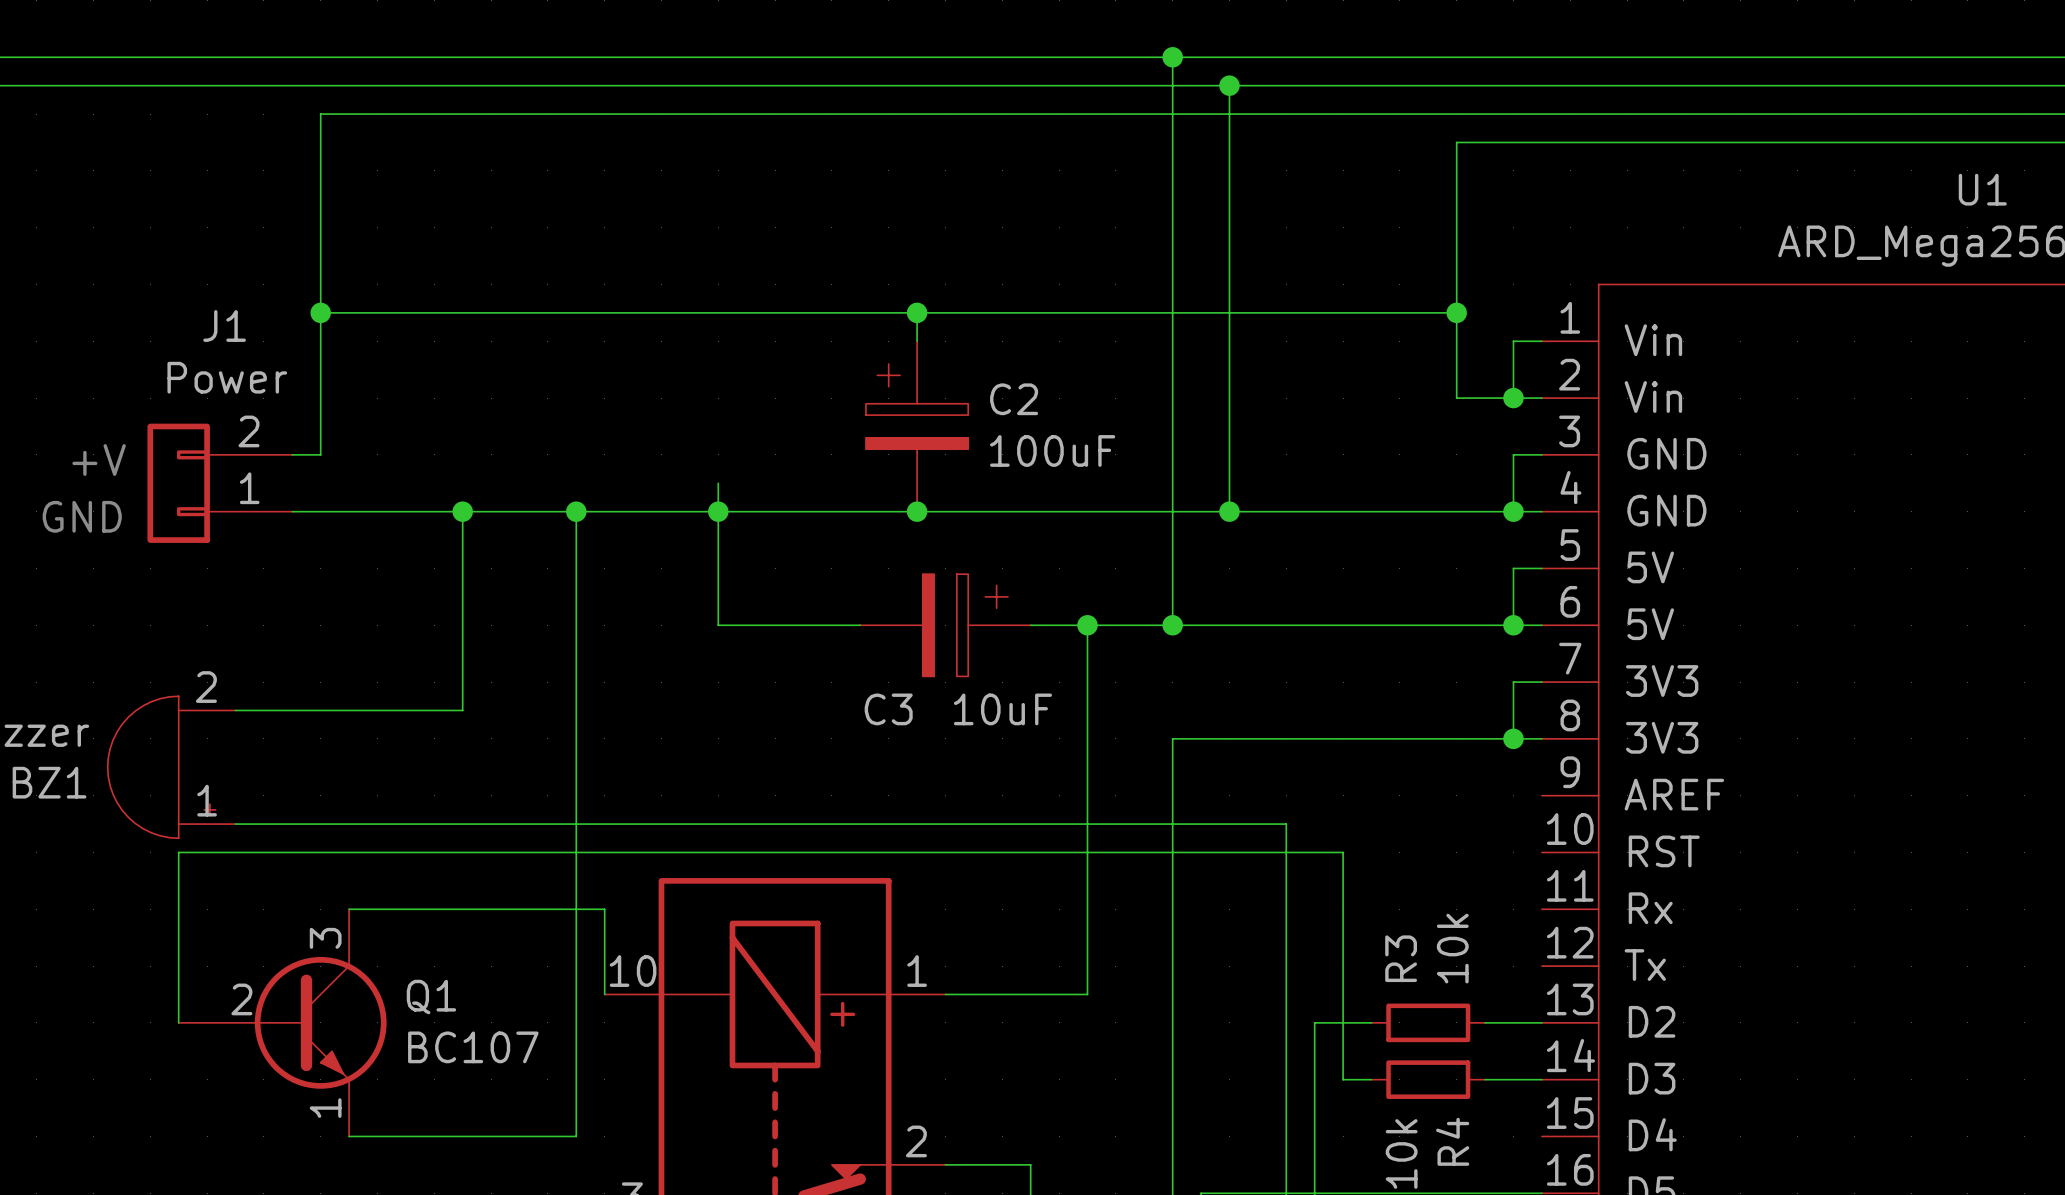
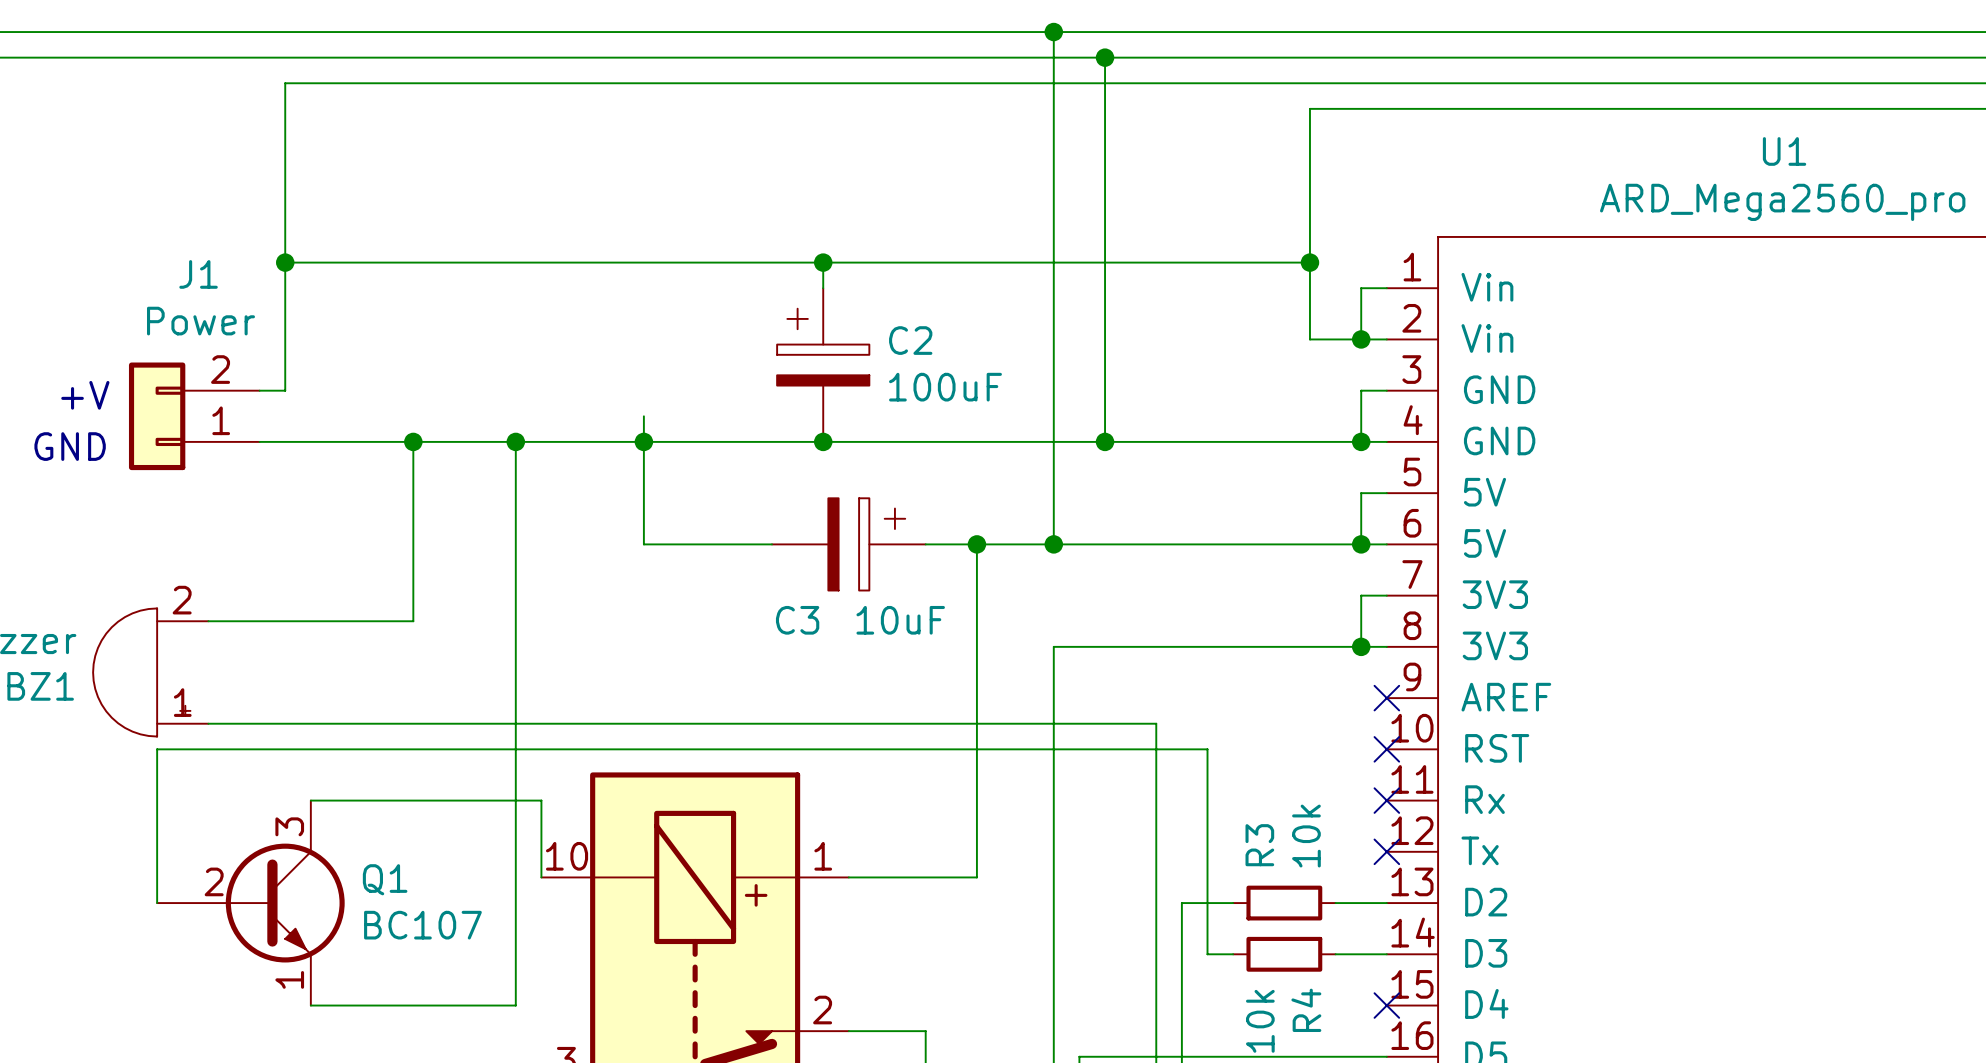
no-connect mark: none -> (1386, 698)
no-connect mark: none -> (1386, 749)
no-connect mark: none -> (1386, 800)
no-connect mark: none -> (1386, 851)
no-connect mark: none -> (1386, 1005)

